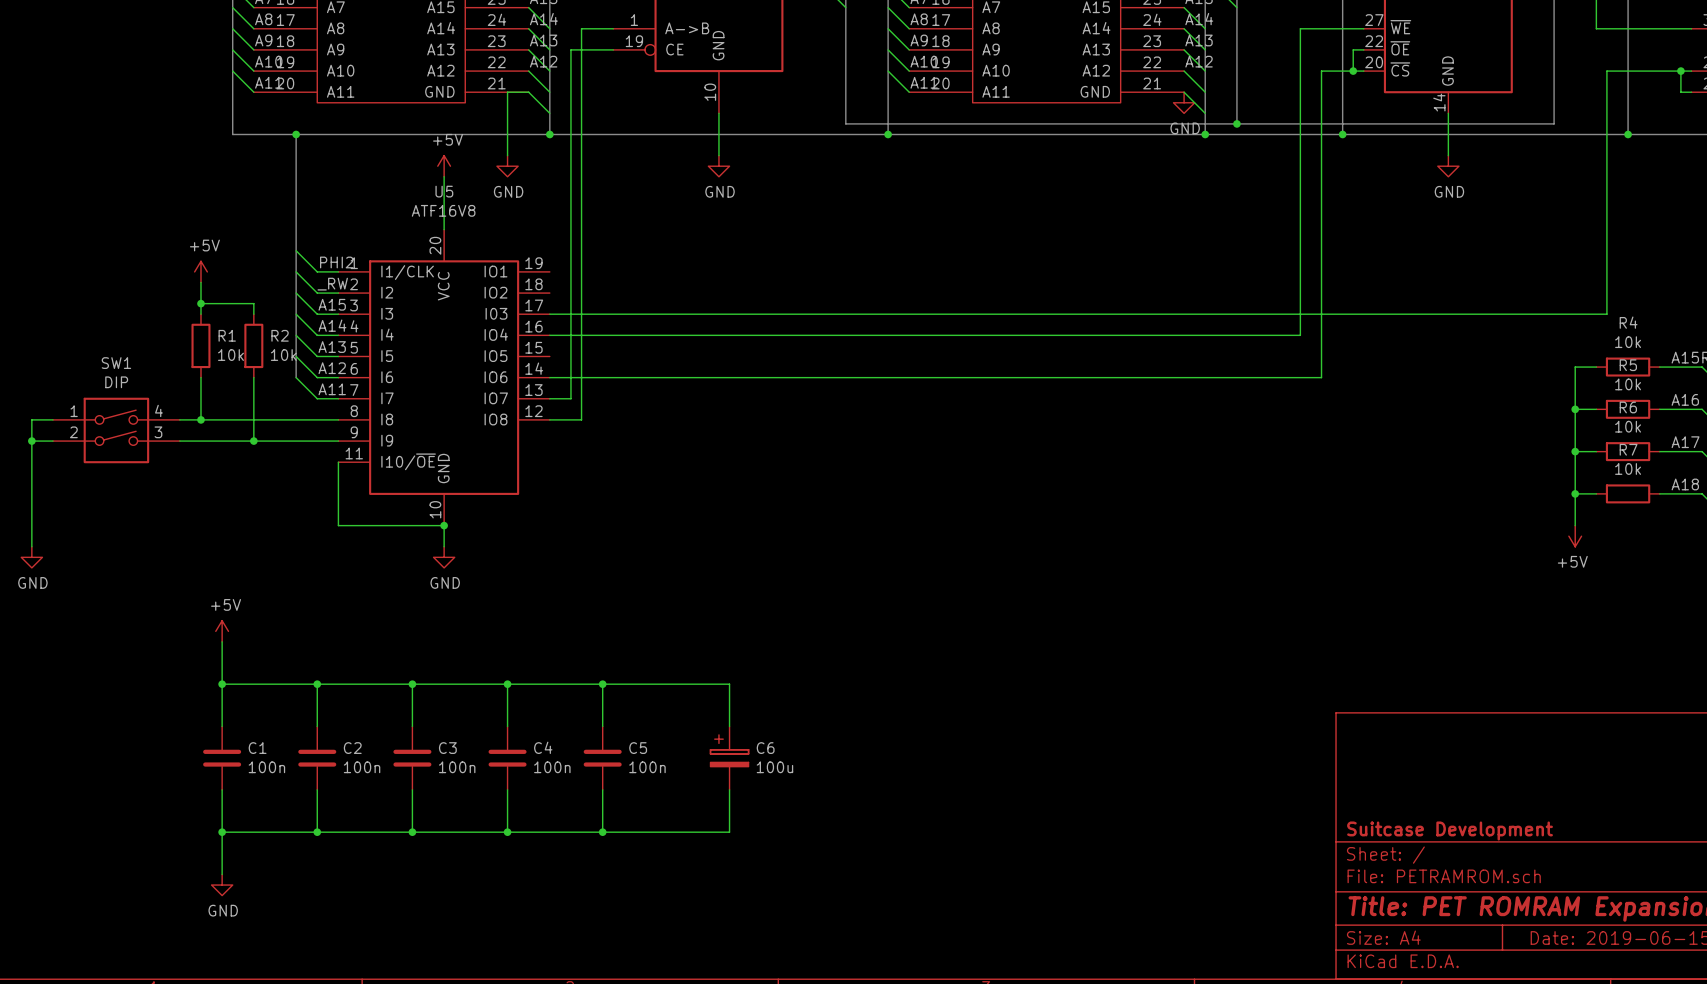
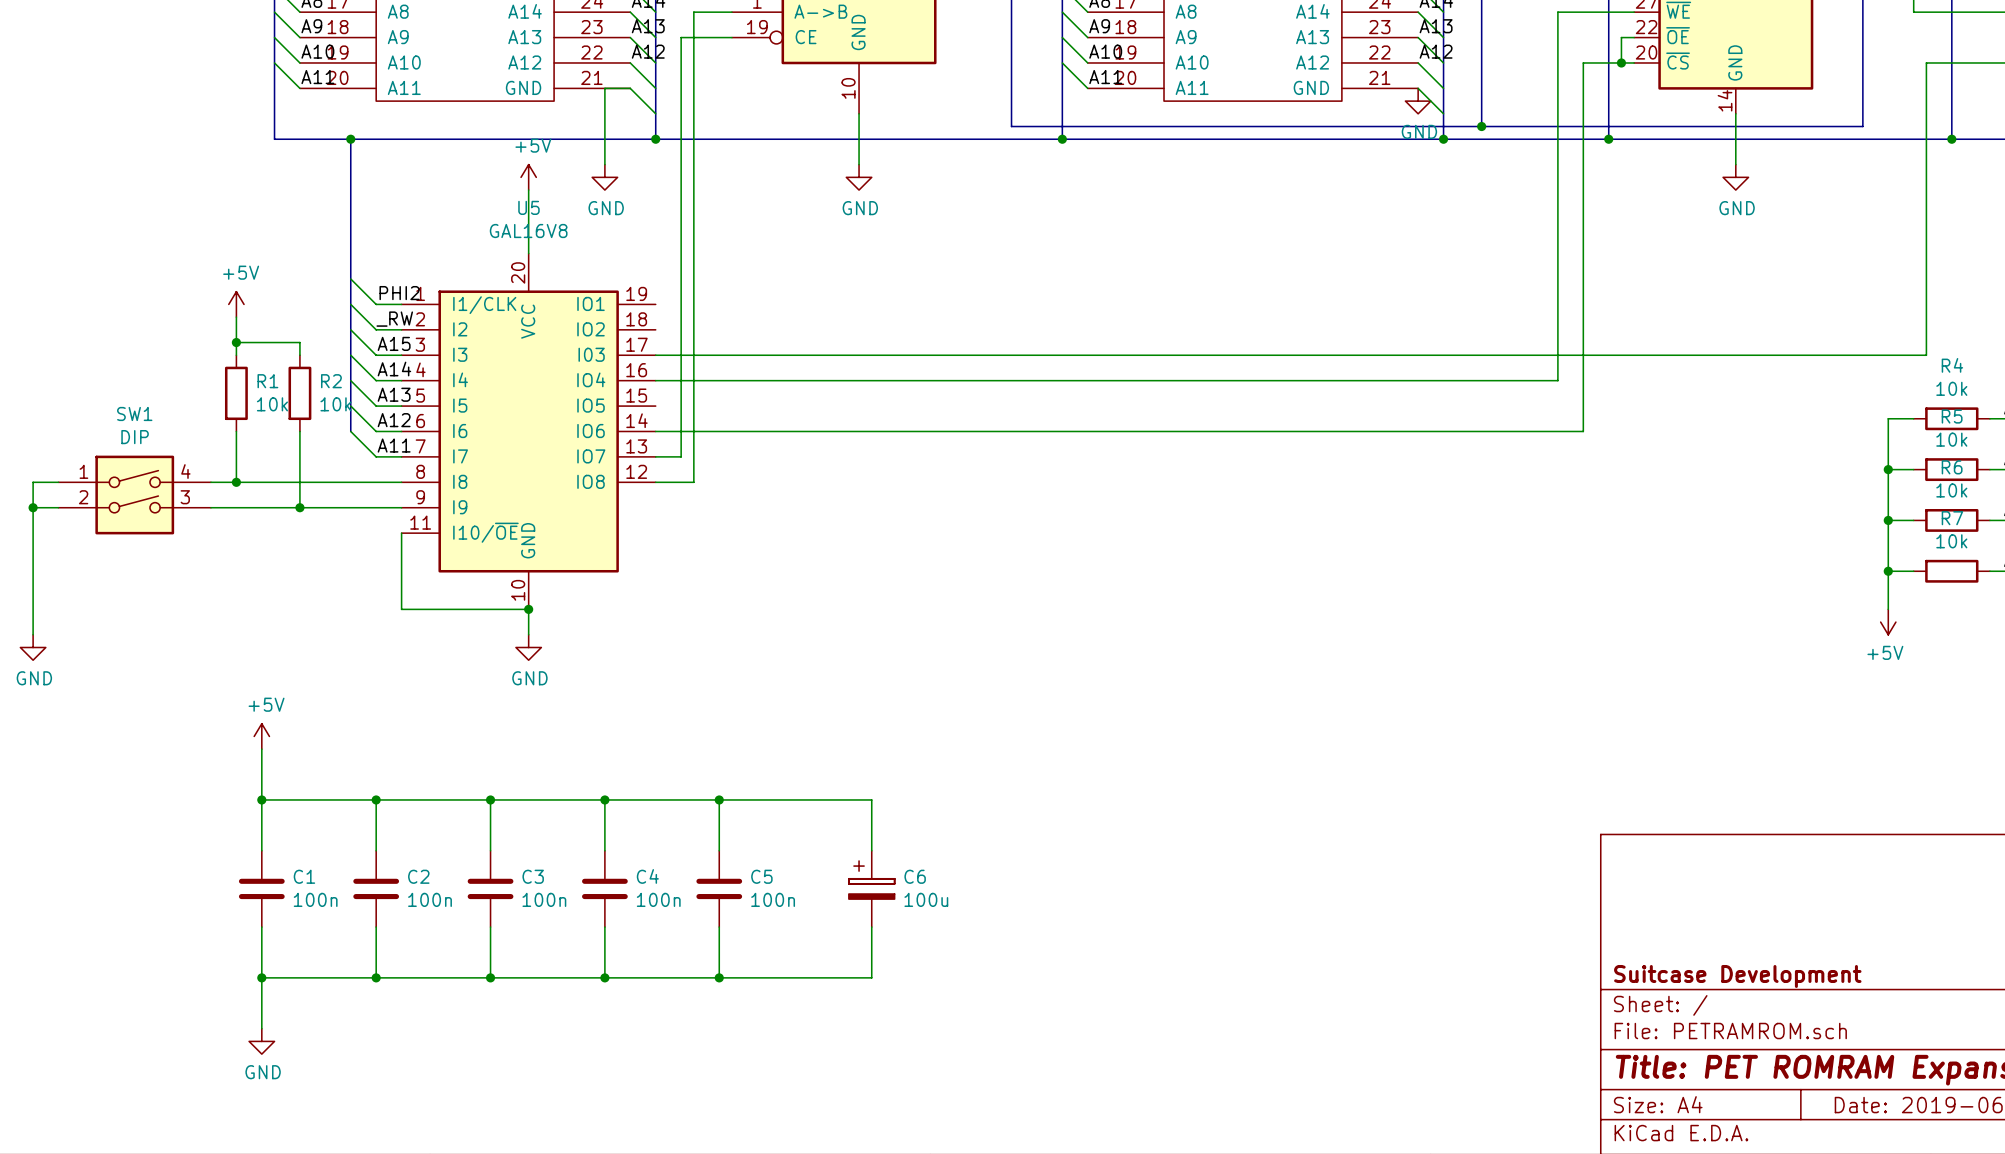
U5 value: ATF16V8 (443, 210) -> GAL16V8 (528, 231)

